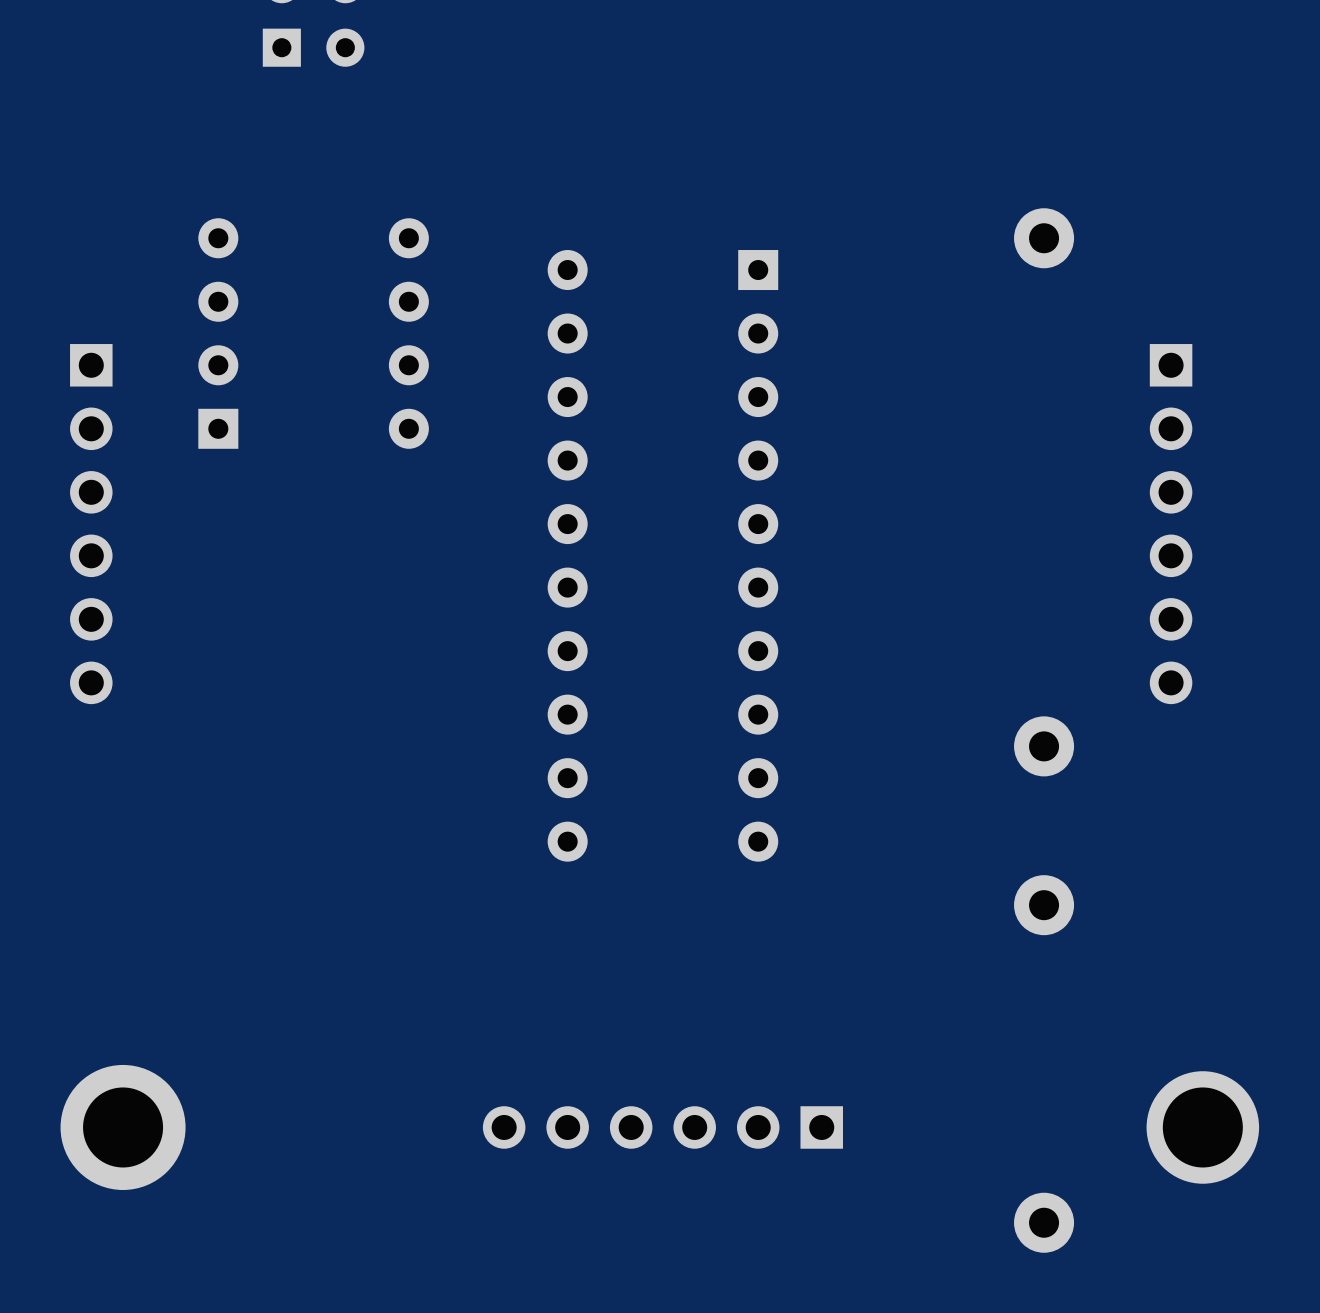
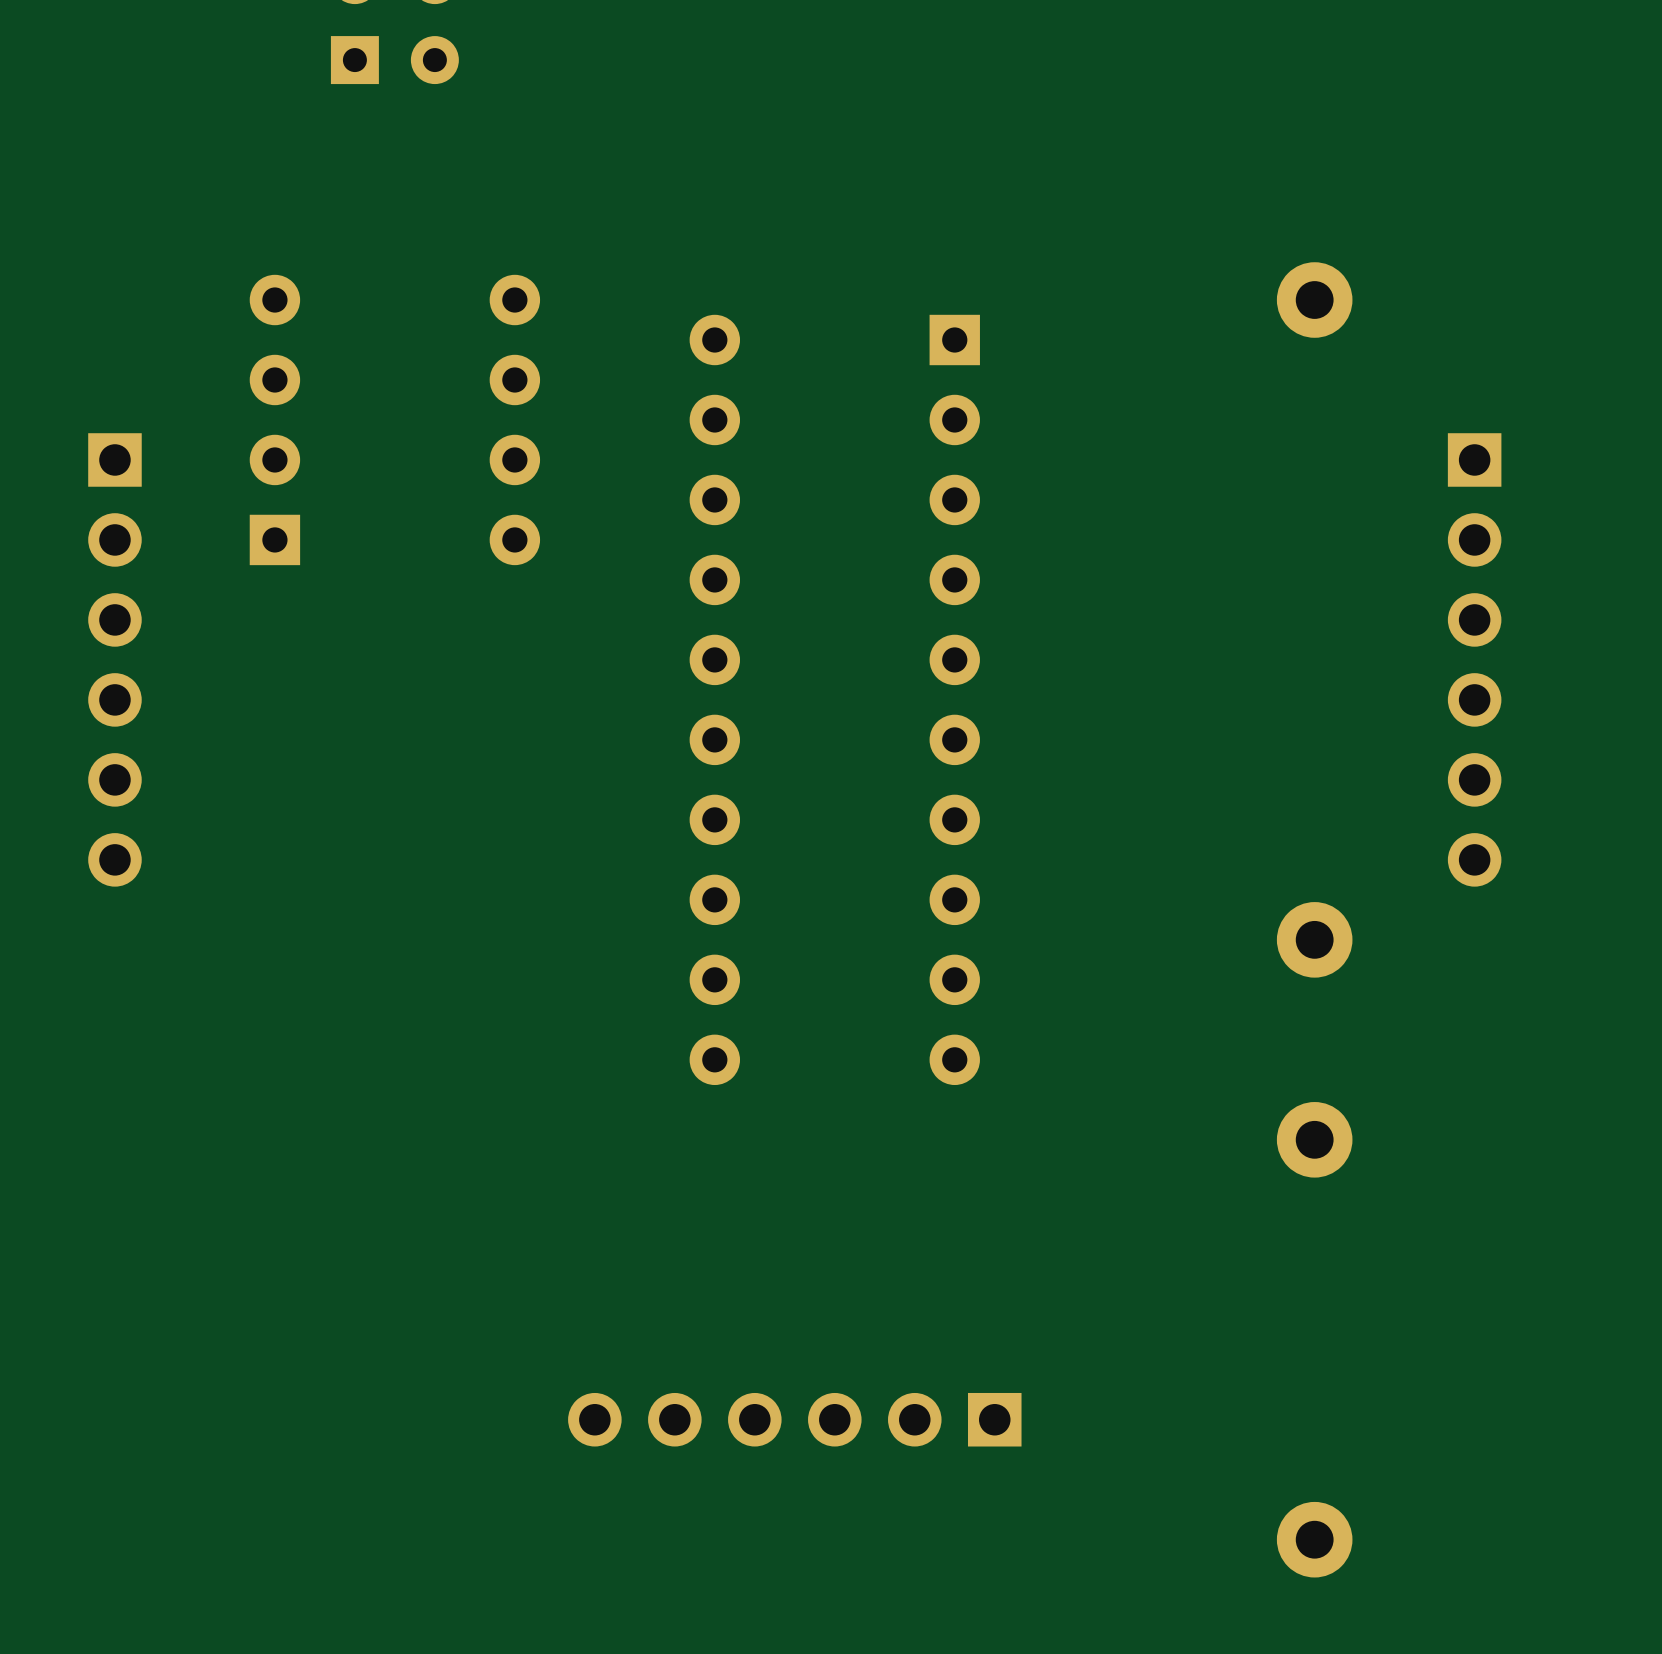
part: (123, 1127) -> none
part position: (662, 1127) -> (794, 1419)
part: (1202, 1127) -> none

